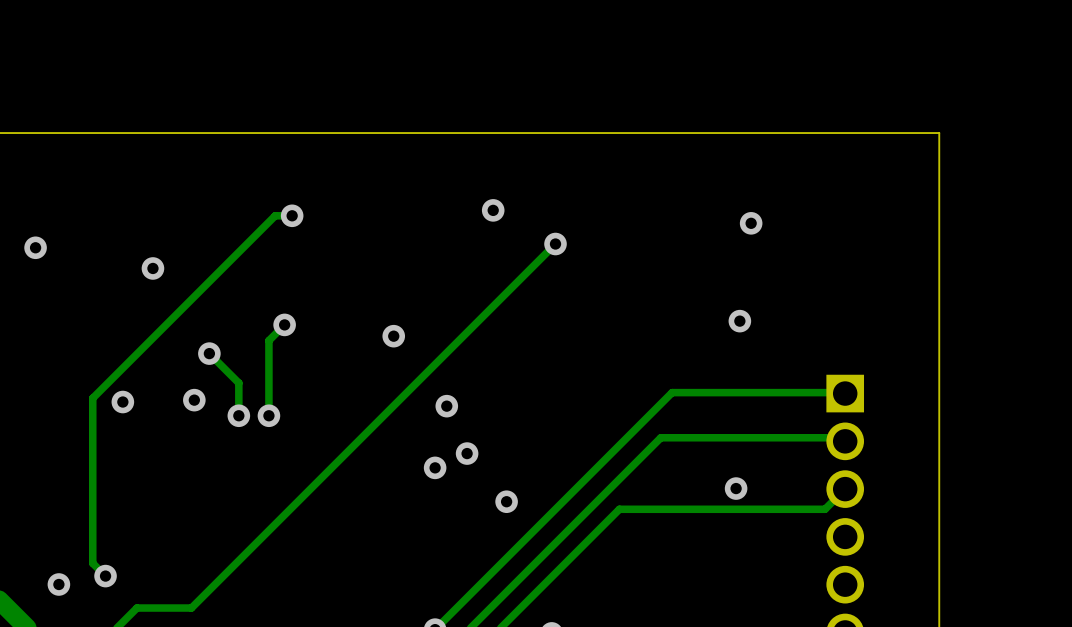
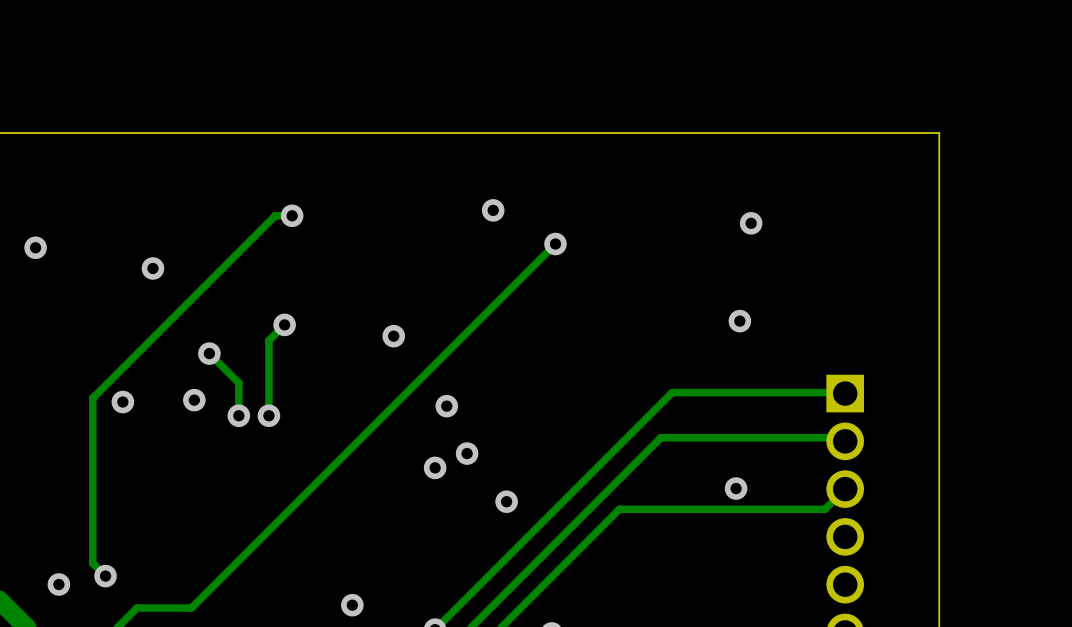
via: none -> (352, 605)

